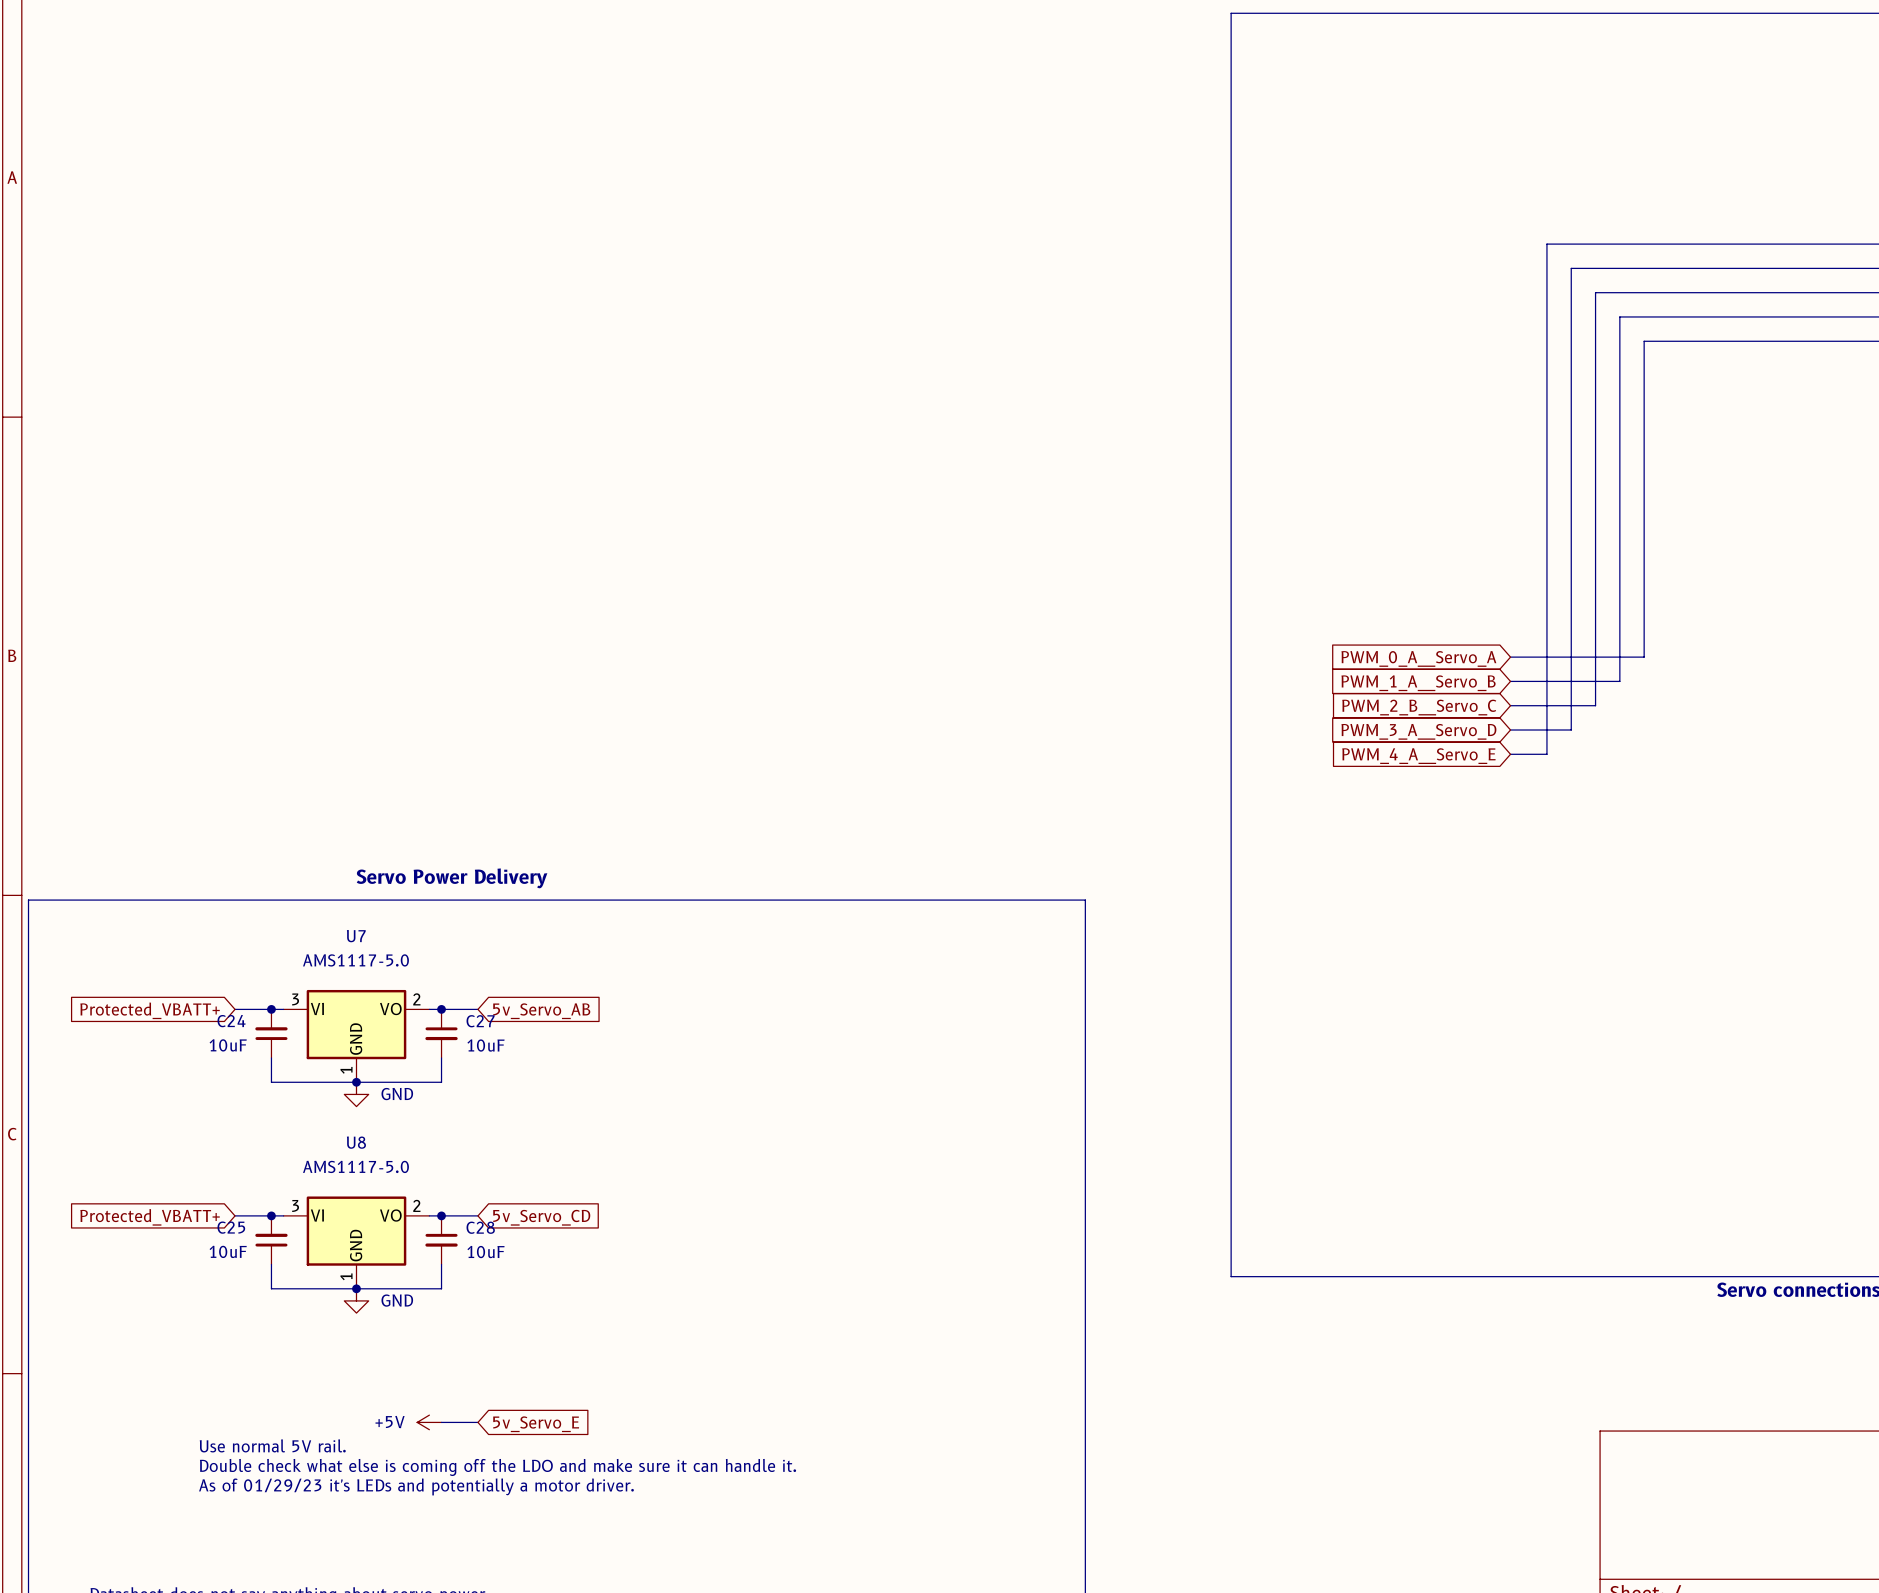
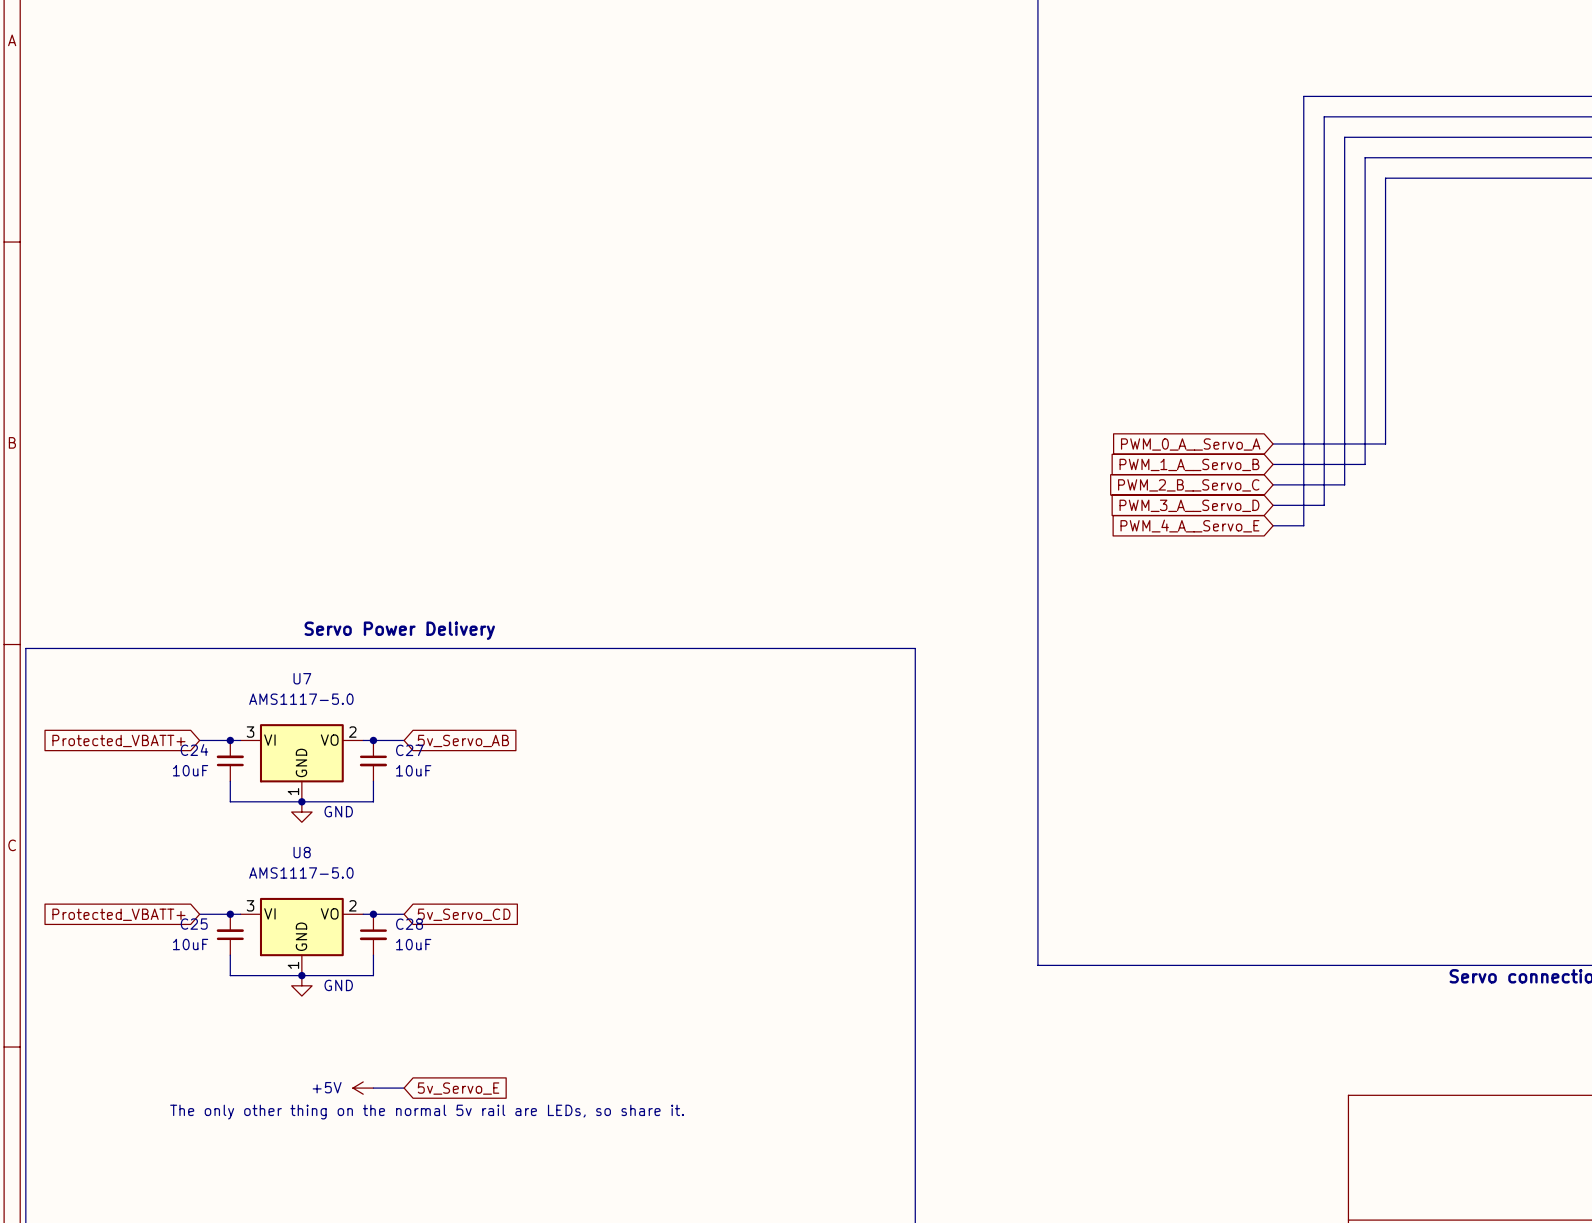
text: Use normal 5V rail. (272, 1445) -> The only other thing on the normal 5v rail are LEDs, so share it. (427, 1112)
text: Double check what else is coming off the LDO and make sure it can handle it. (498, 1467) -> none
text: As of 01/29/23 it's LEDs and potentially a motor driver. (416, 1486) -> none

